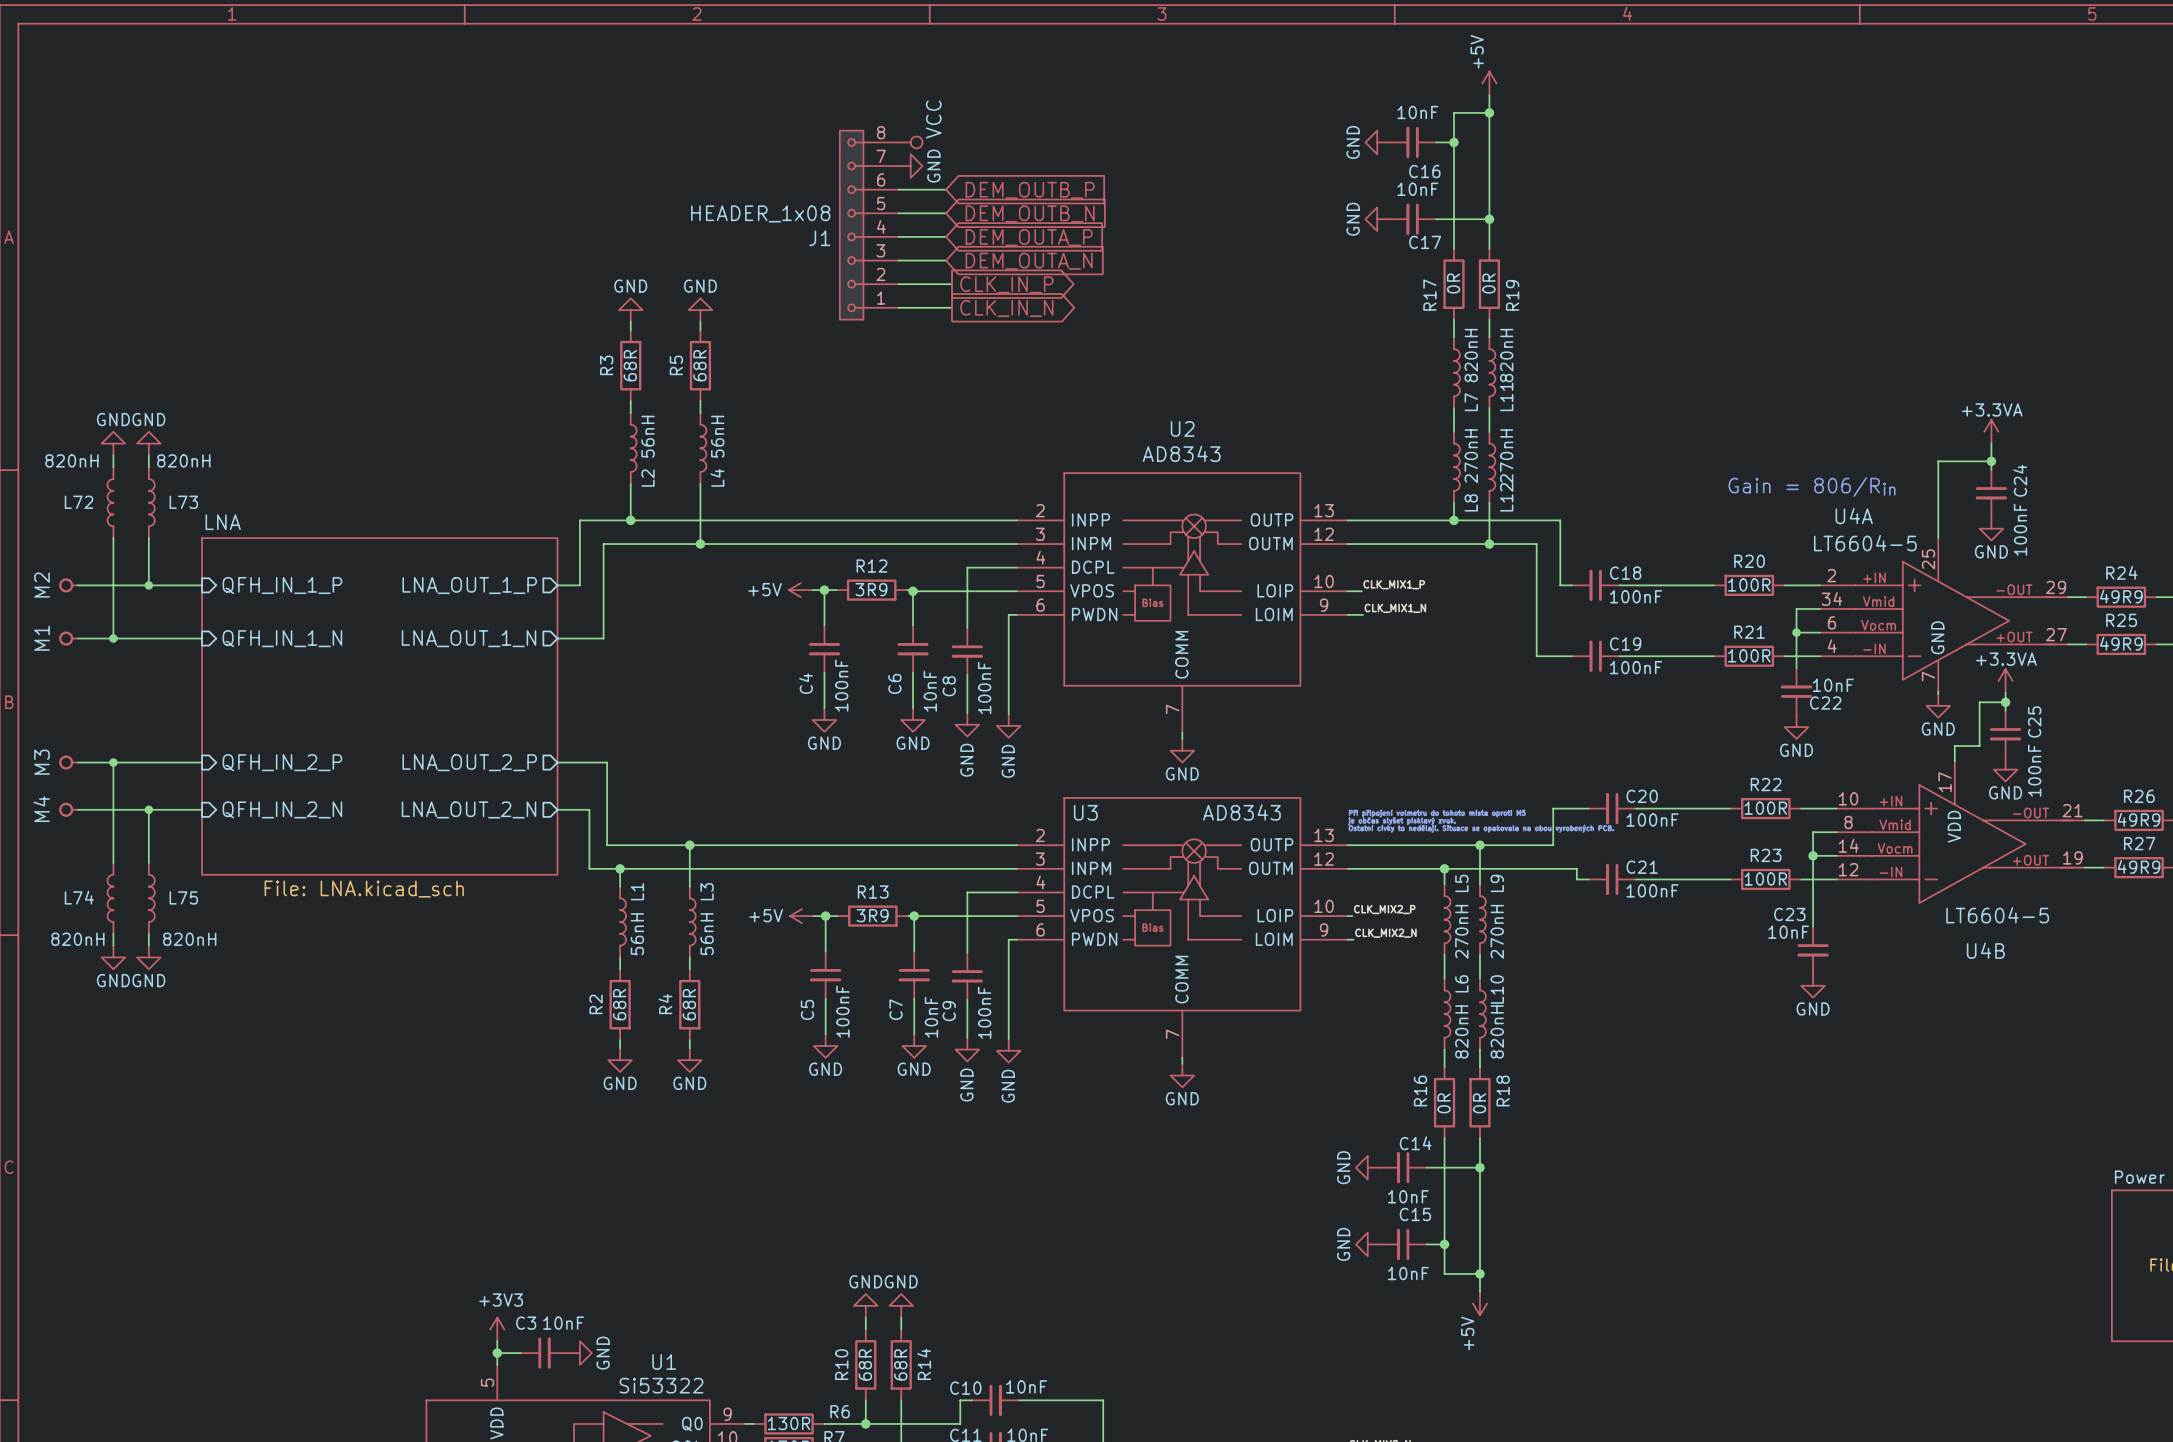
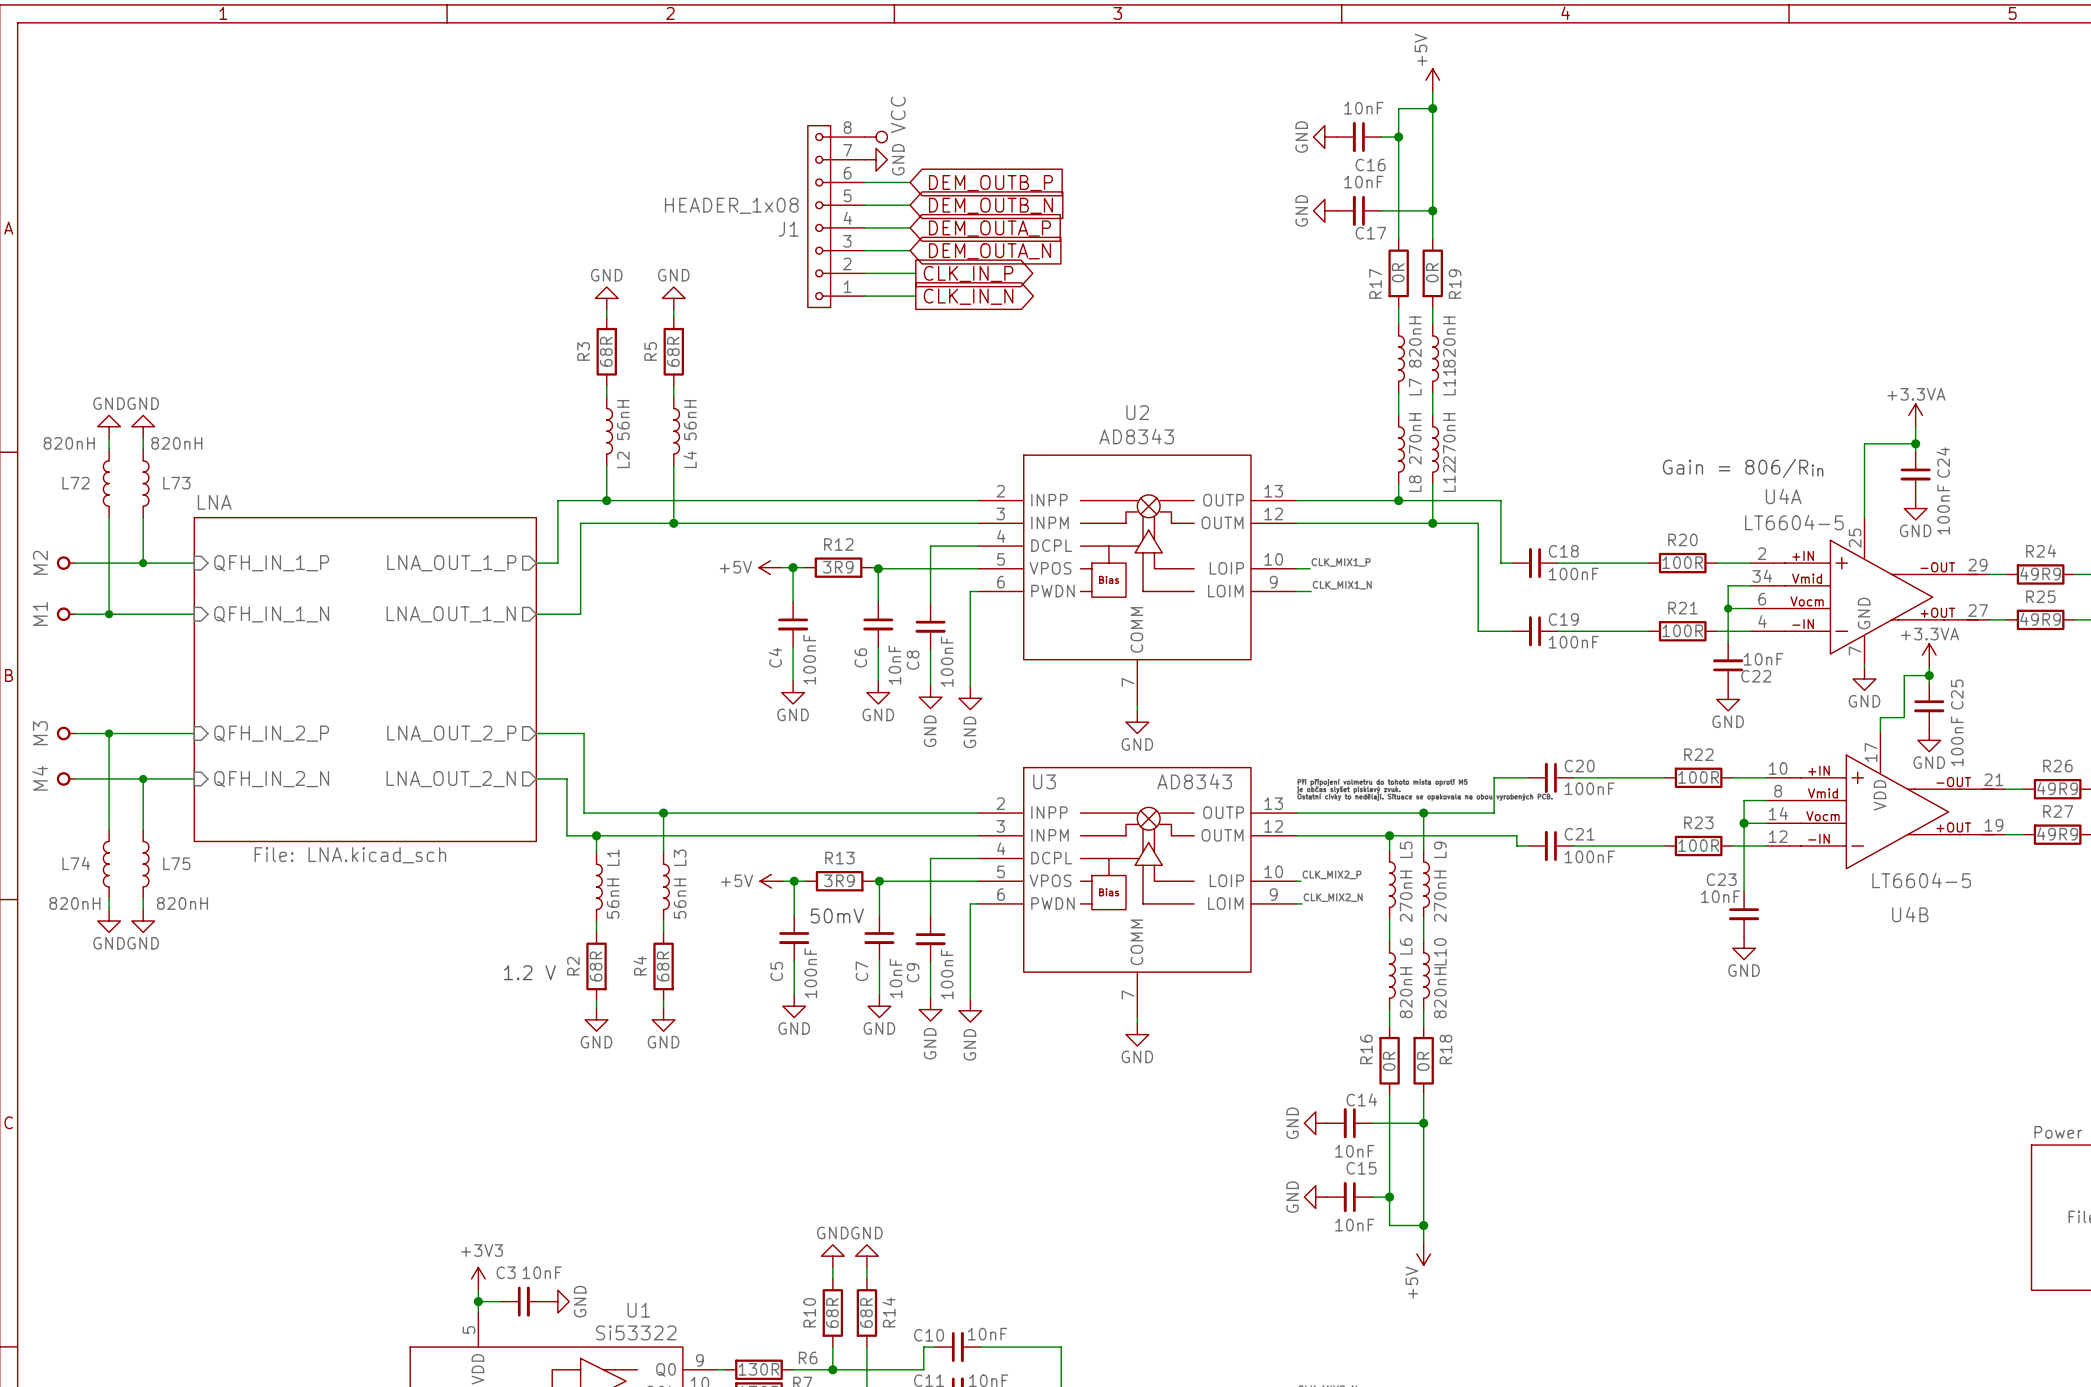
text: none -> 50mV (837, 915)
text: none -> 1.2 V (529, 972)

